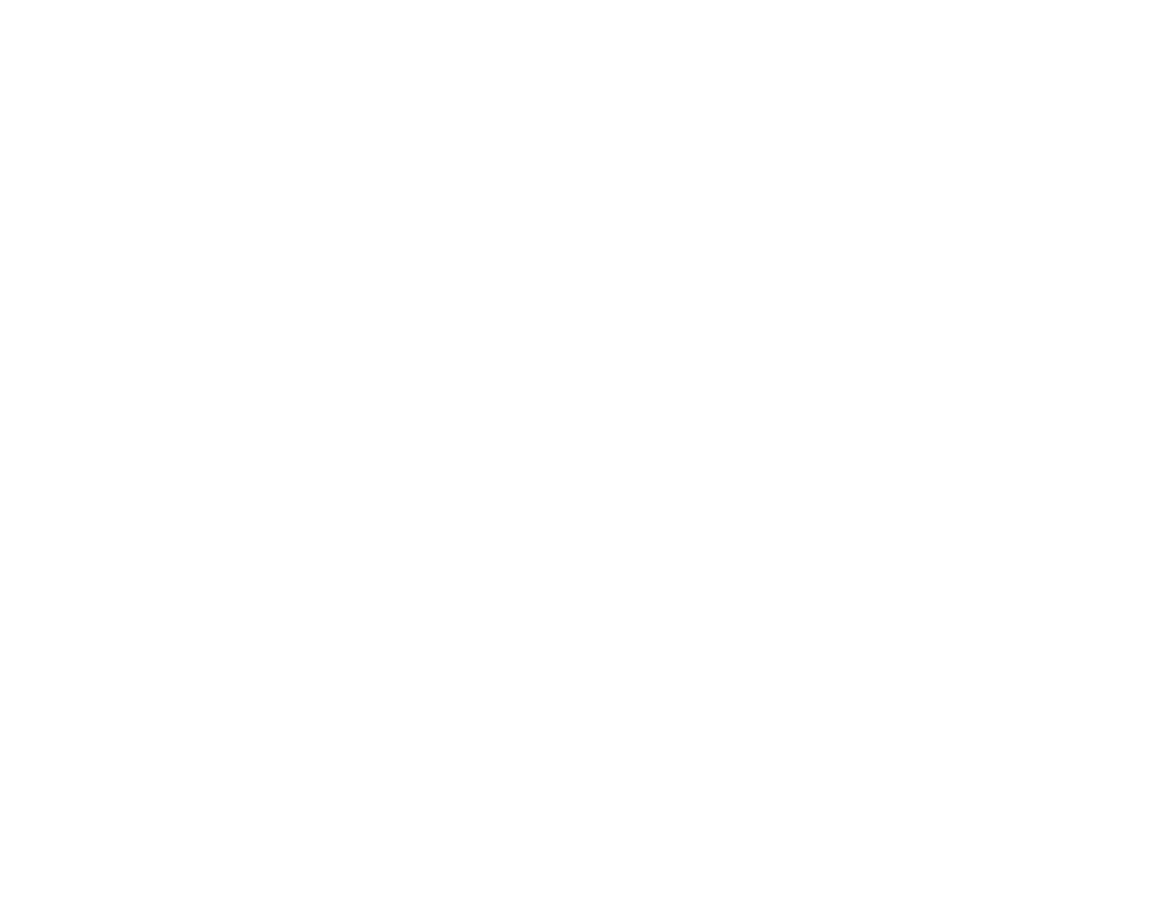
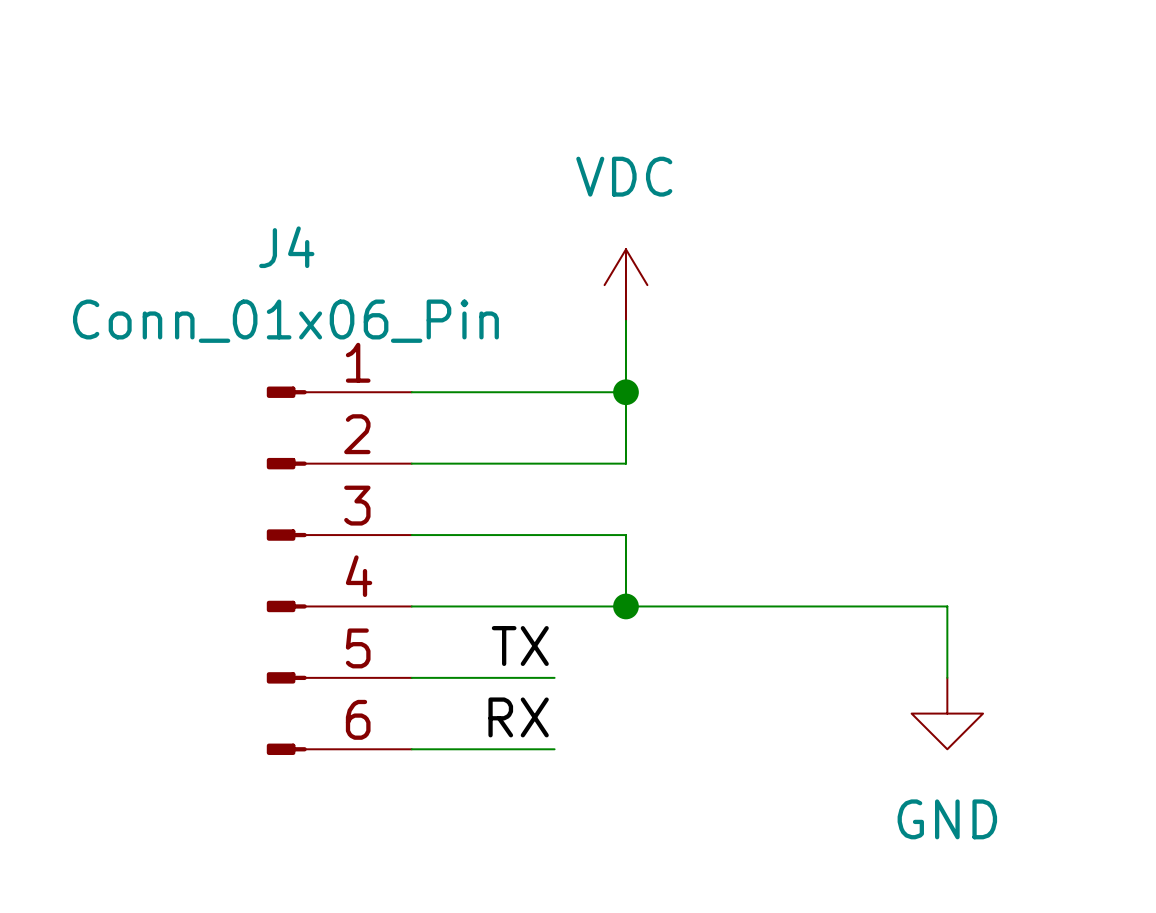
power symbol: none -> VDC (625, 285)
wire: none -> (625, 320) (625, 463) (411, 463)
wire: none -> (411, 392) (625, 392)
junction: none -> (625, 392)
wire: none -> (411, 535) (625, 535) (625, 606)
J4: none -> Conn_01x06_Pin (339, 570)
wire: none -> (411, 606) (947, 606) (947, 677)
junction: none -> (625, 606)
label: none -> TX (520, 646)
wire: none -> (411, 677) (554, 677)
power symbol: none -> GND (947, 713)
label: none -> RX (518, 717)
wire: none -> (411, 749) (554, 749)

